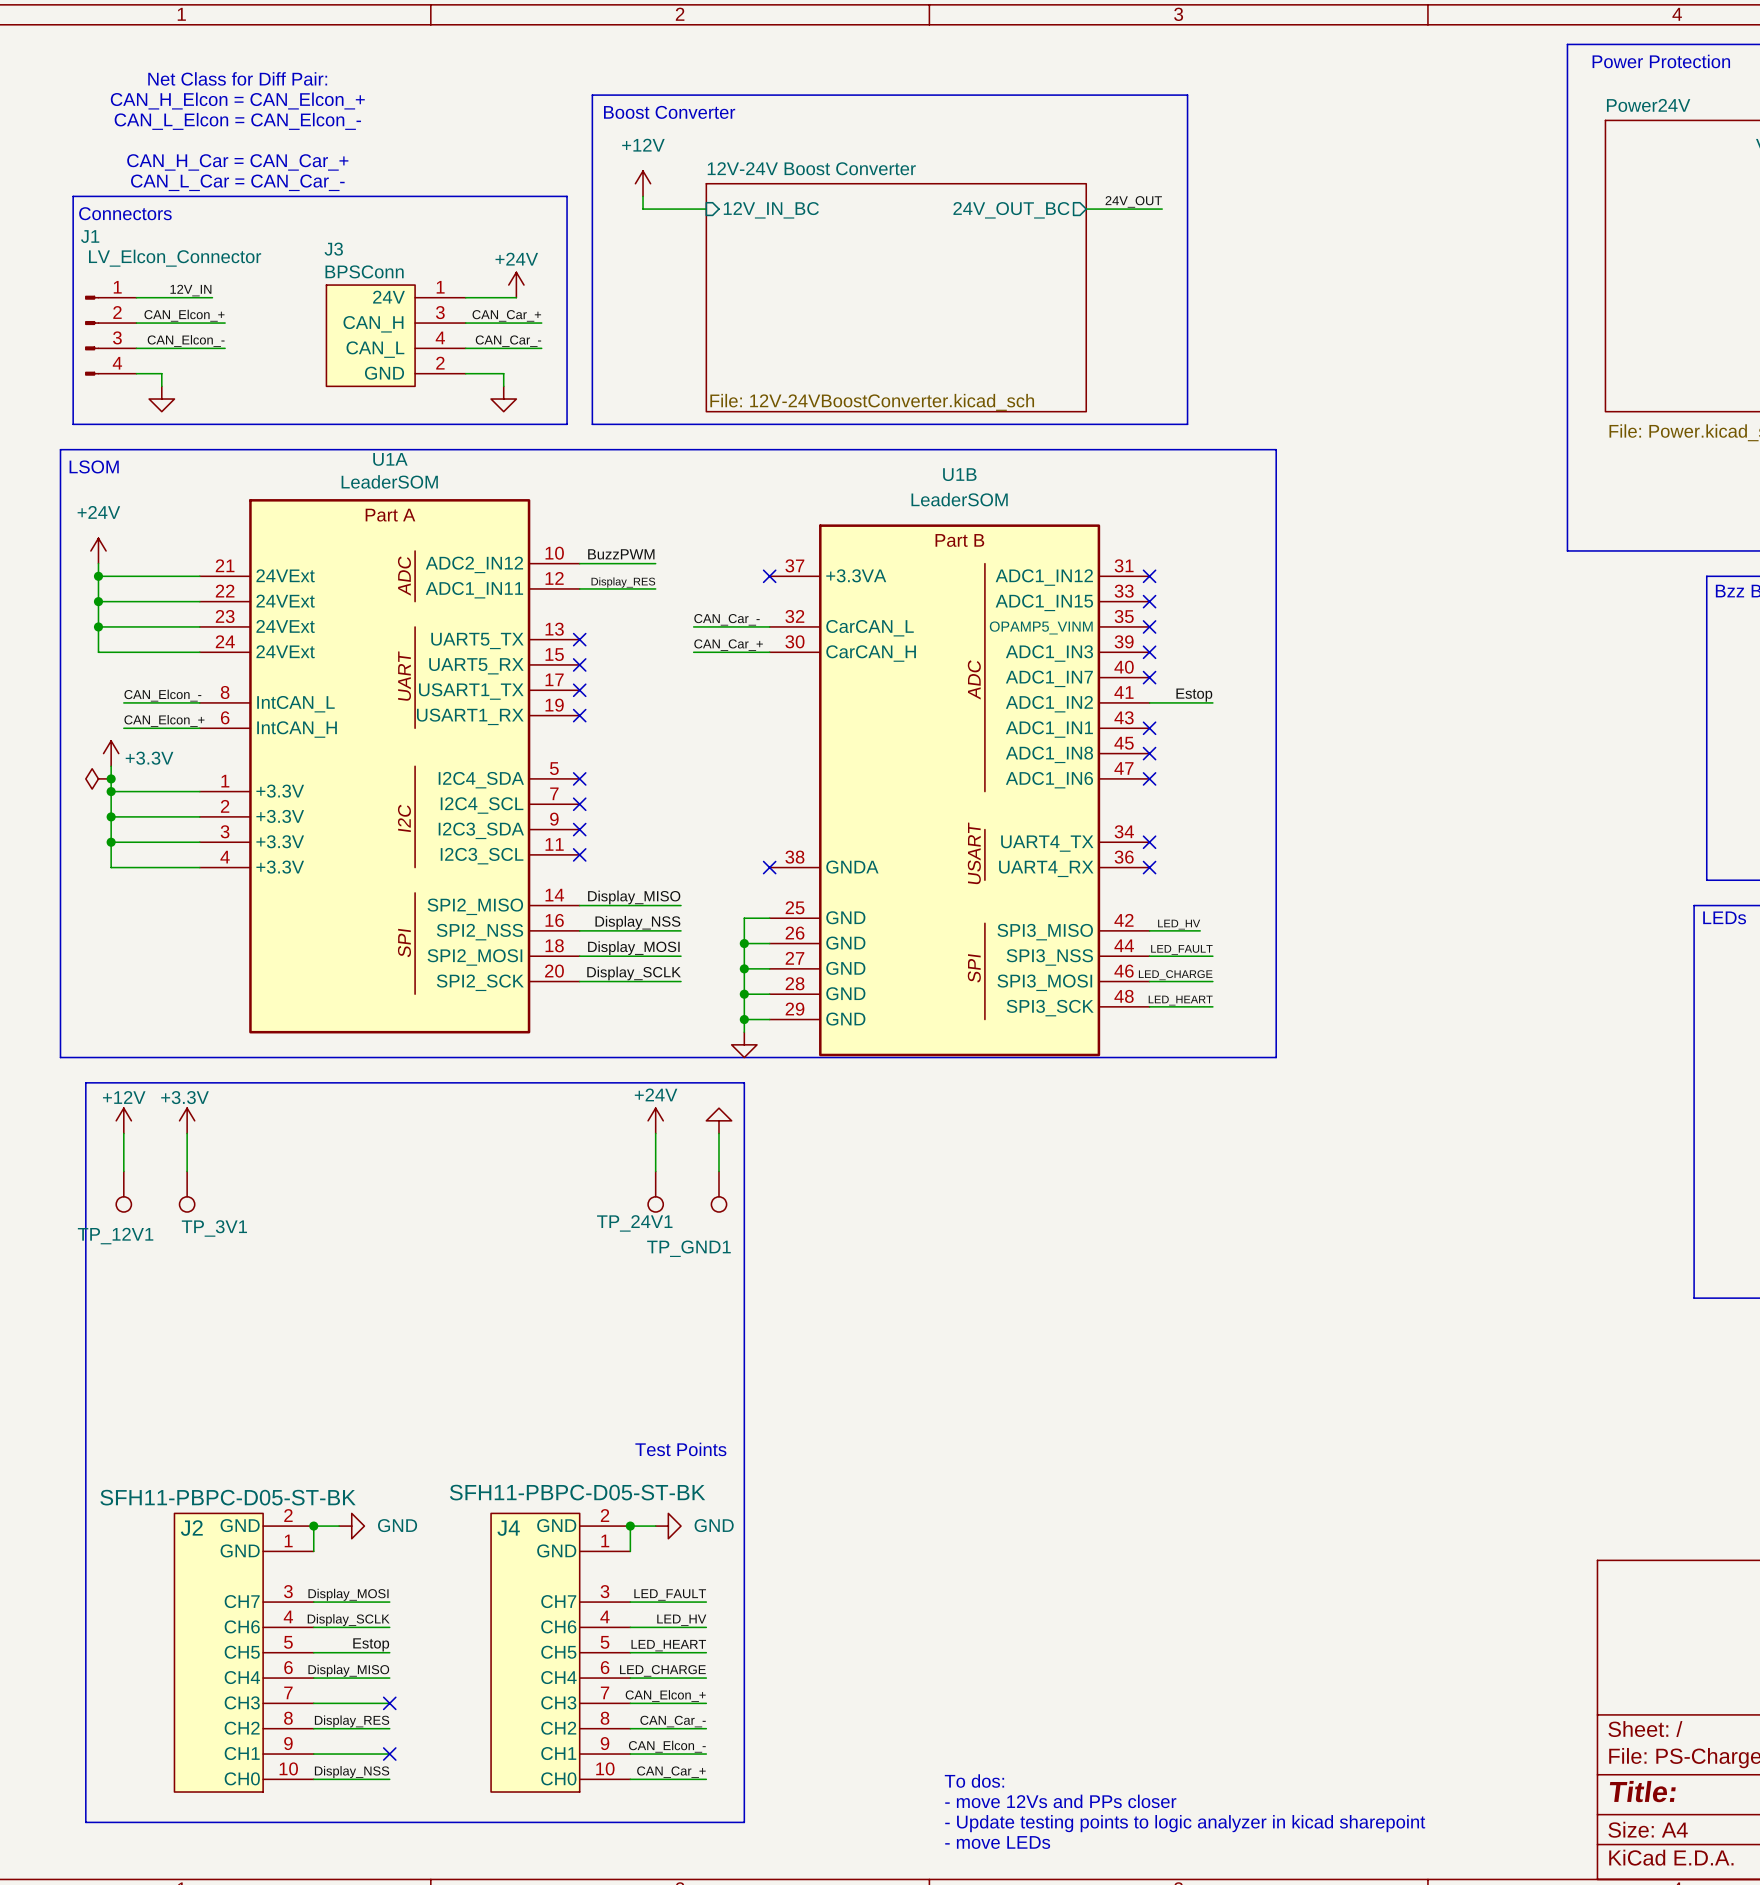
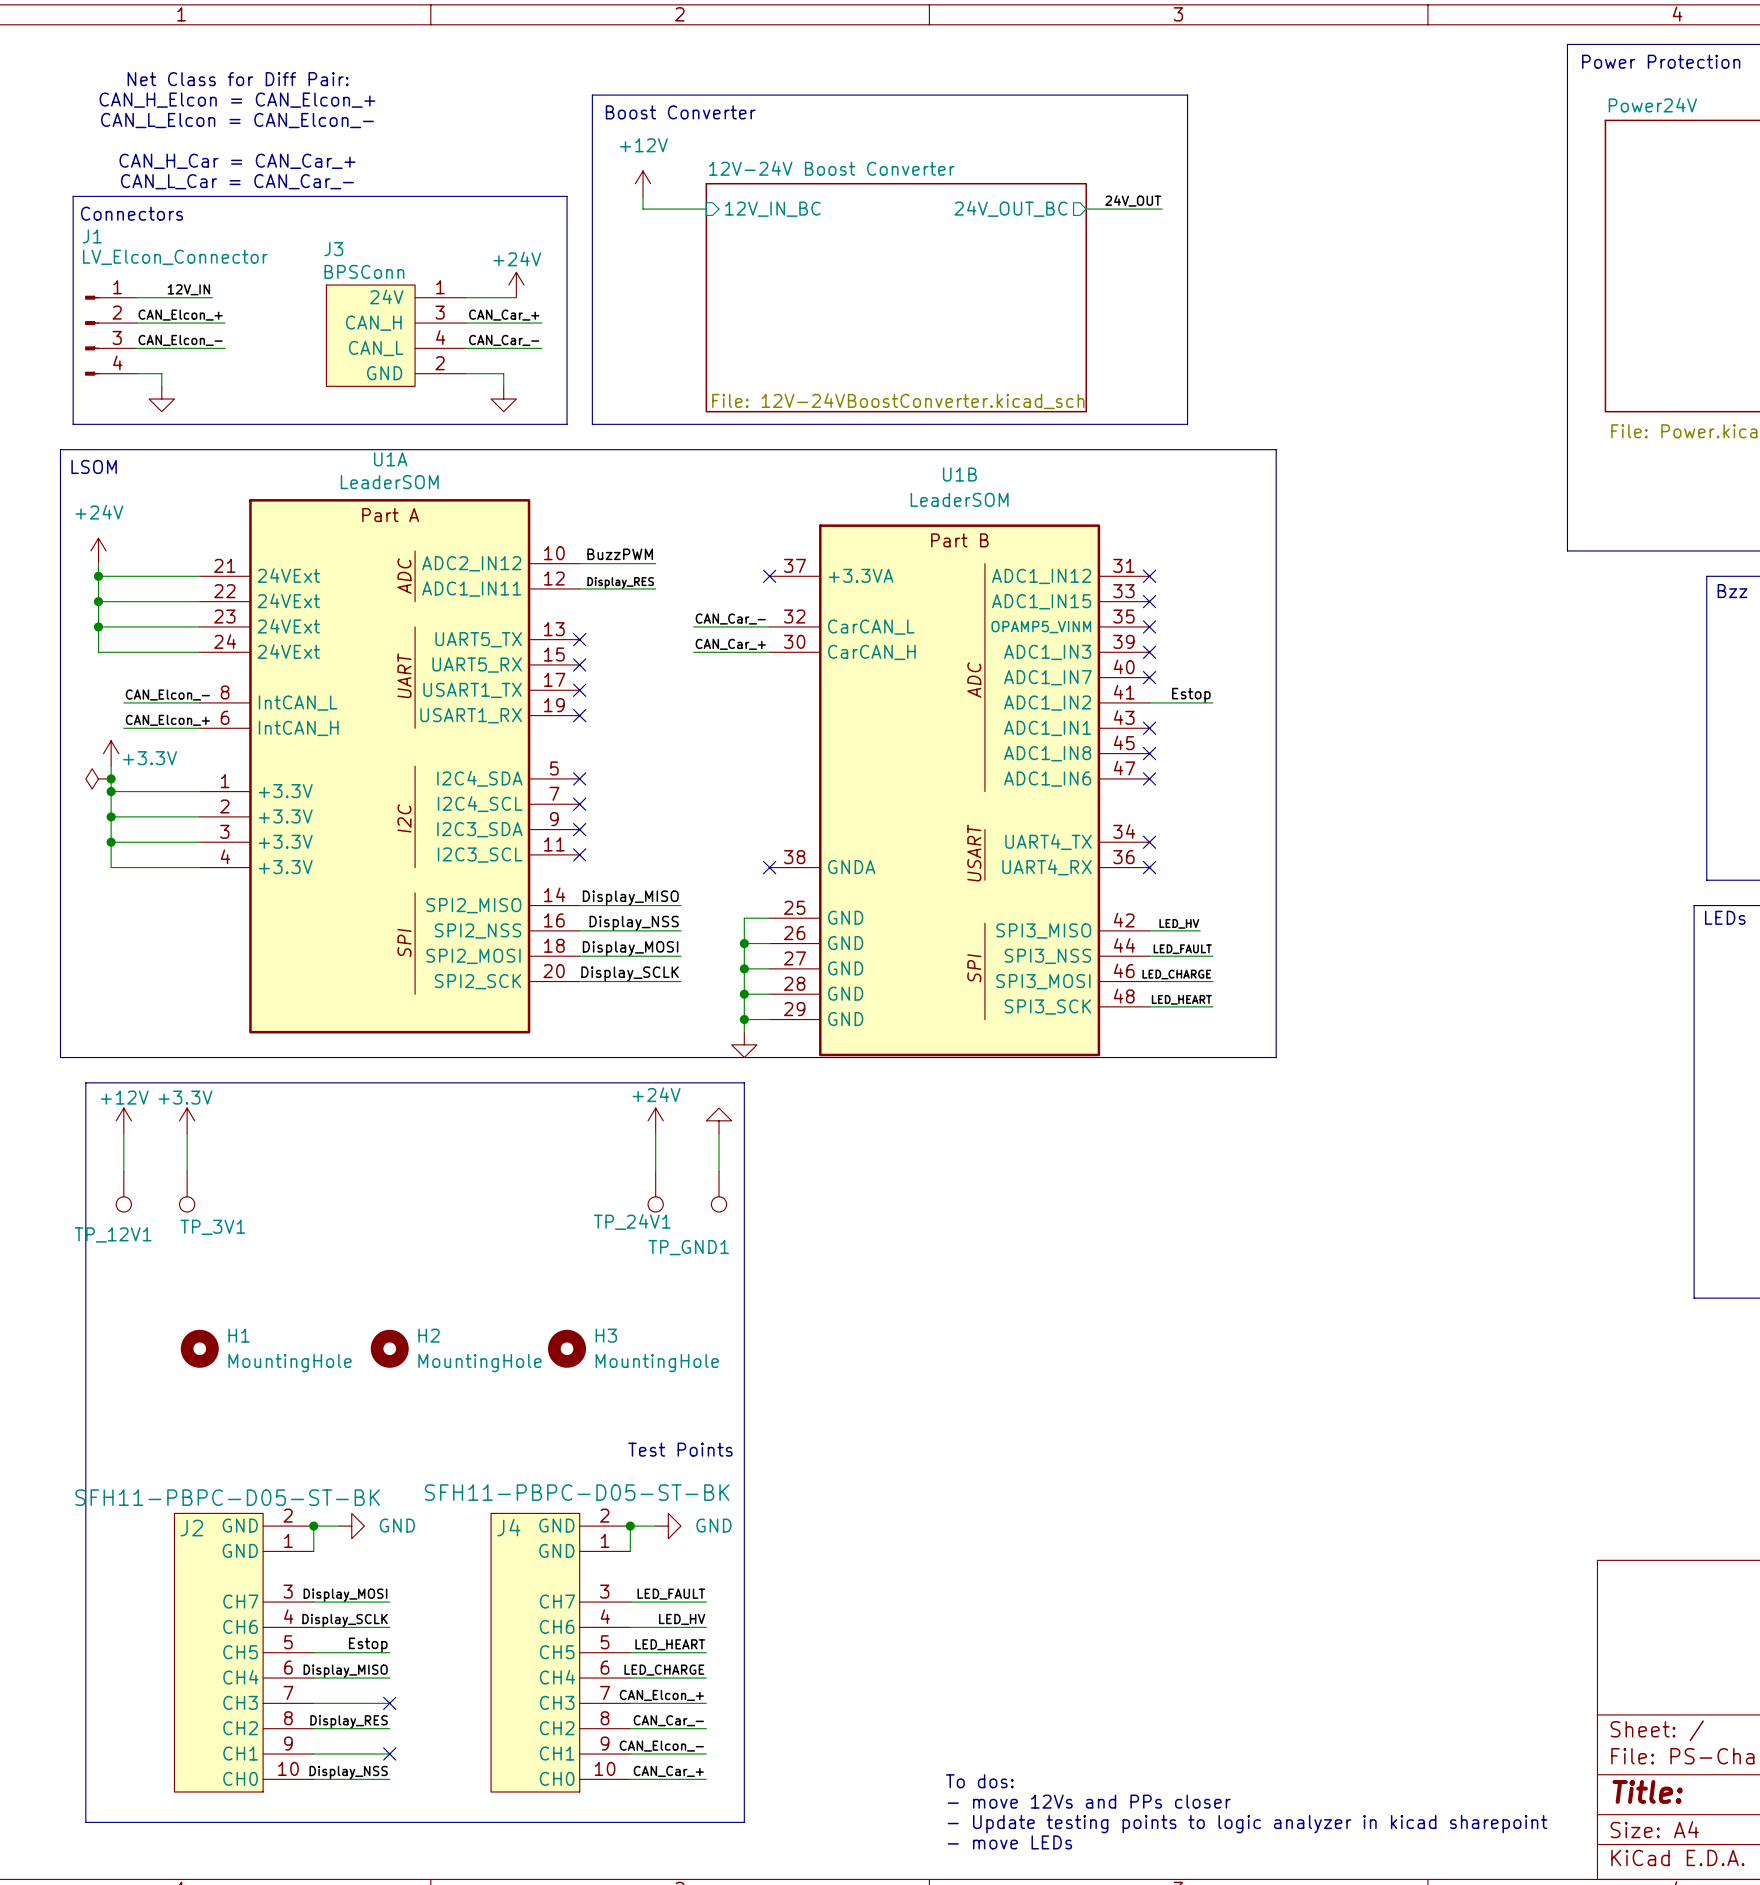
H1: none -> MountingHole (199, 1348)
H2: none -> MountingHole (389, 1348)
H3: none -> MountingHole (567, 1348)

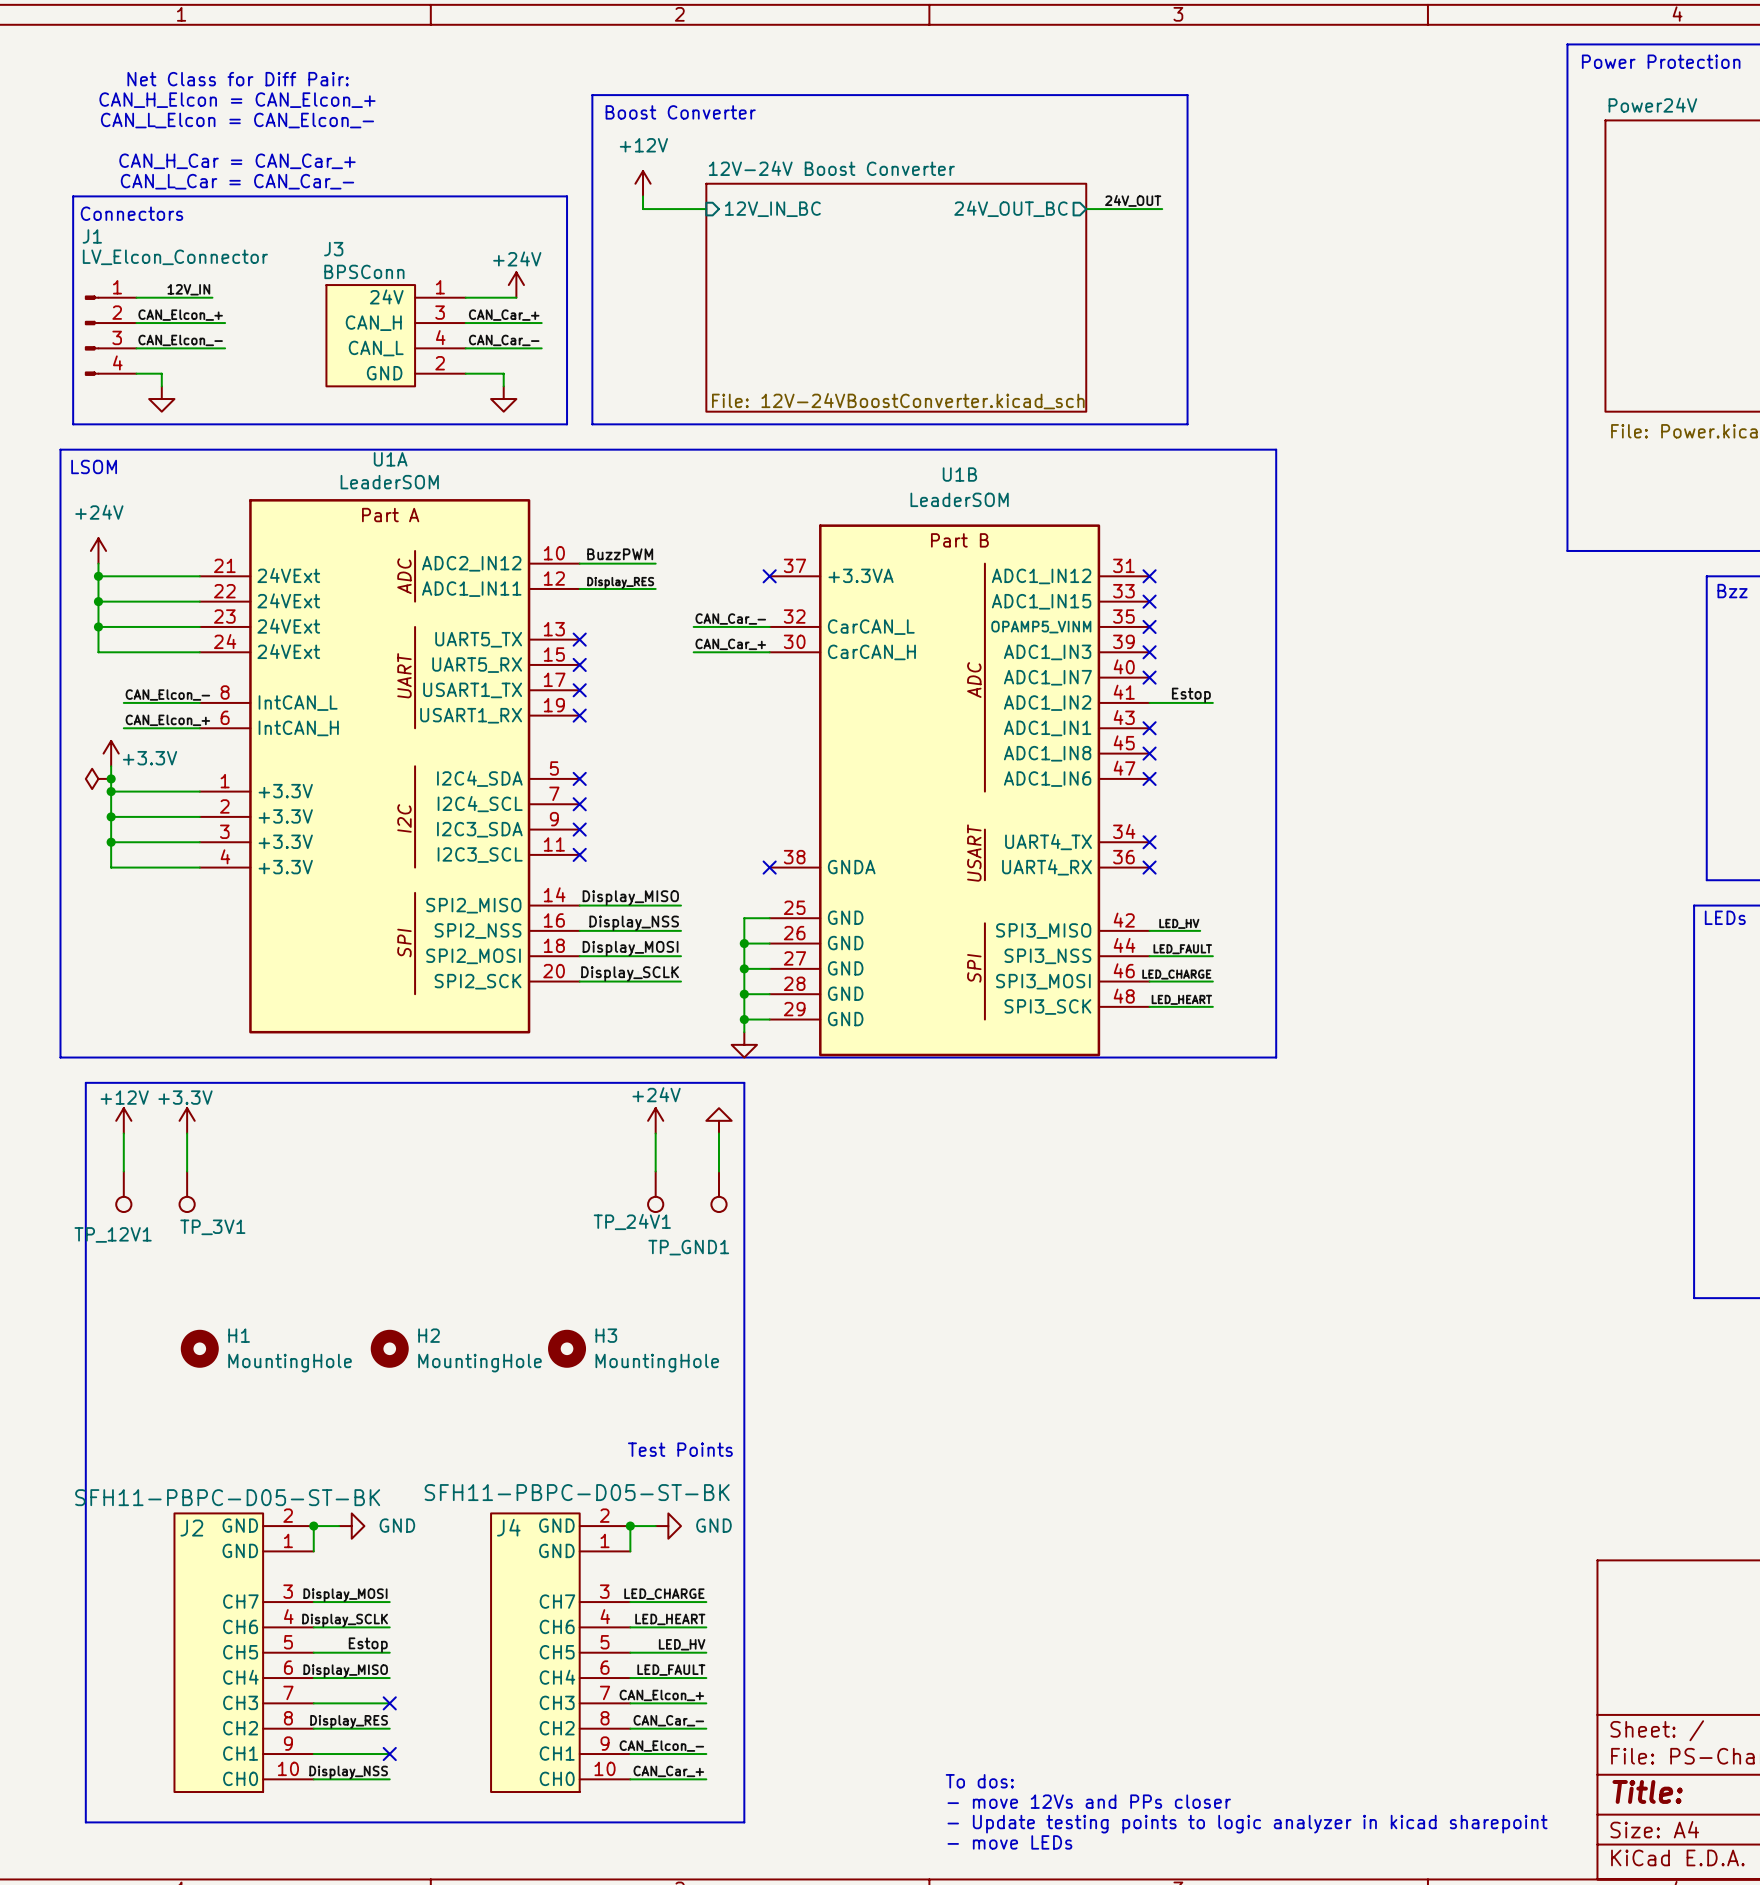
label: LED_FAULT (671, 1594) -> LED_CHARGE (664, 1594)
label: LED_HV (682, 1619) -> LED_HEART (670, 1619)
label: LED_HEART (670, 1644) -> LED_HV (682, 1644)
label: LED_CHARGE (664, 1670) -> LED_FAULT (671, 1670)

